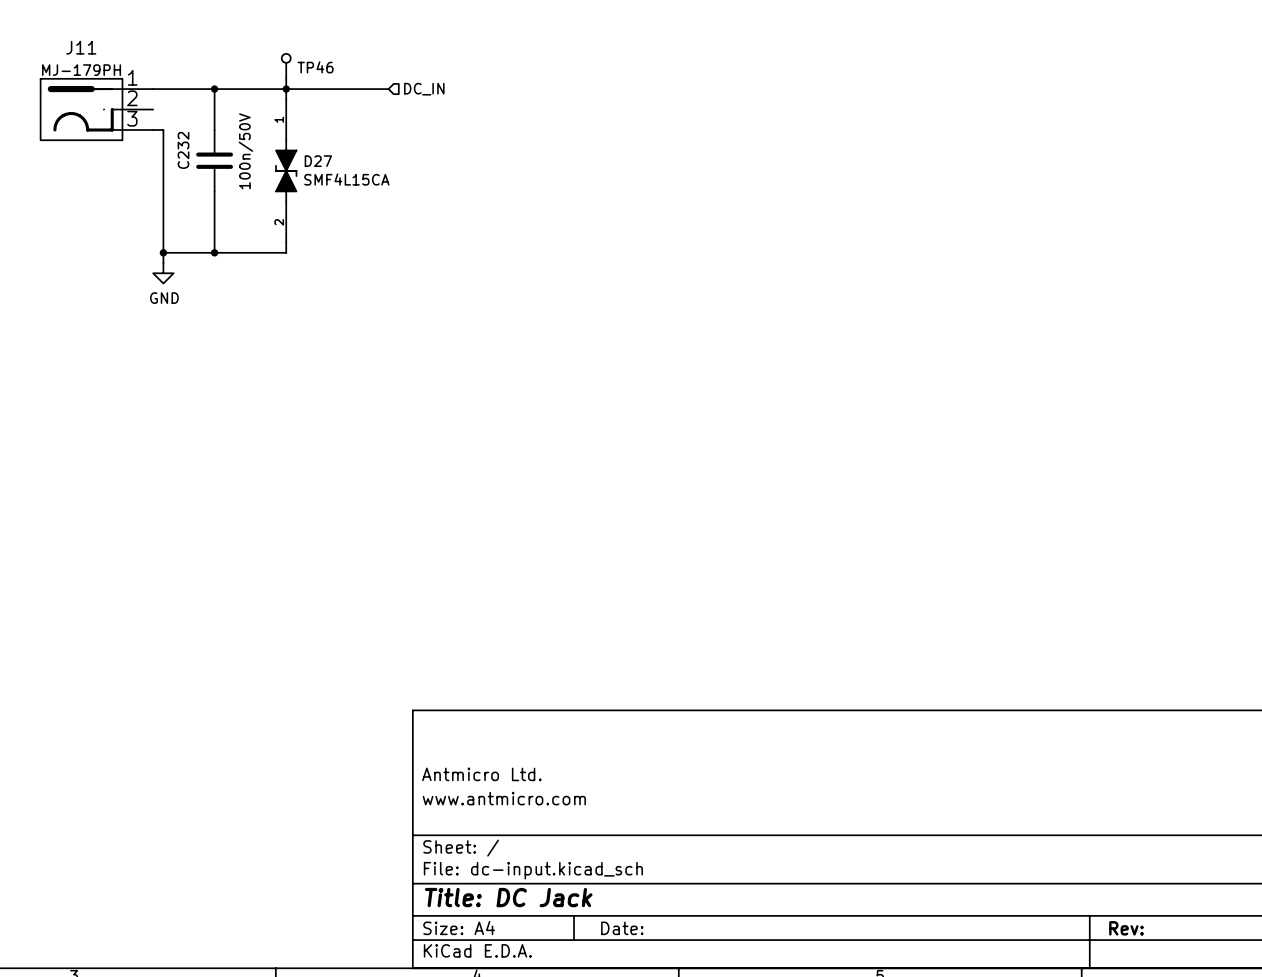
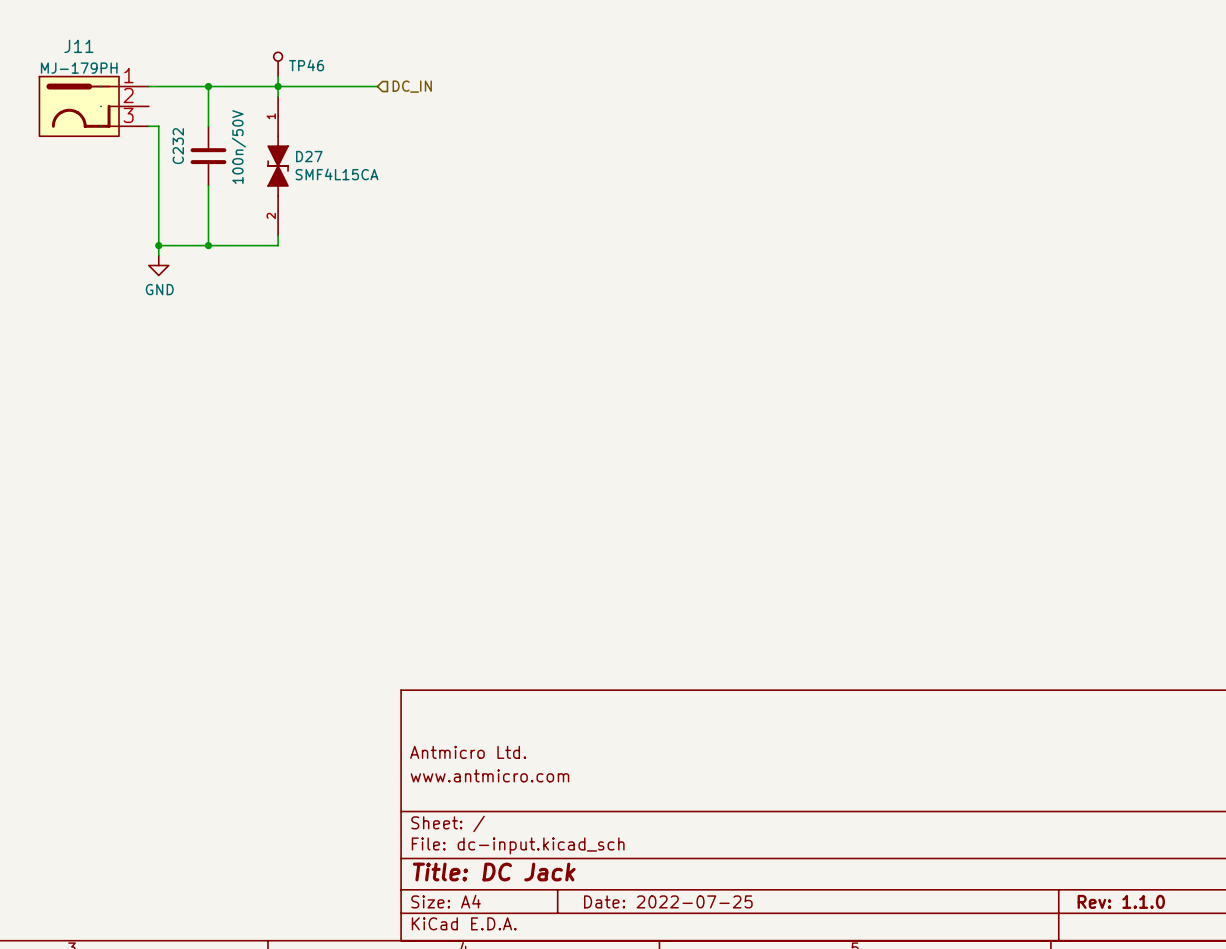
title block: Date: (622, 928) -> Date: 2022-07-25 (668, 901)
title block: Rev: (1126, 928) -> Rev: 1.1.0 (1121, 901)

